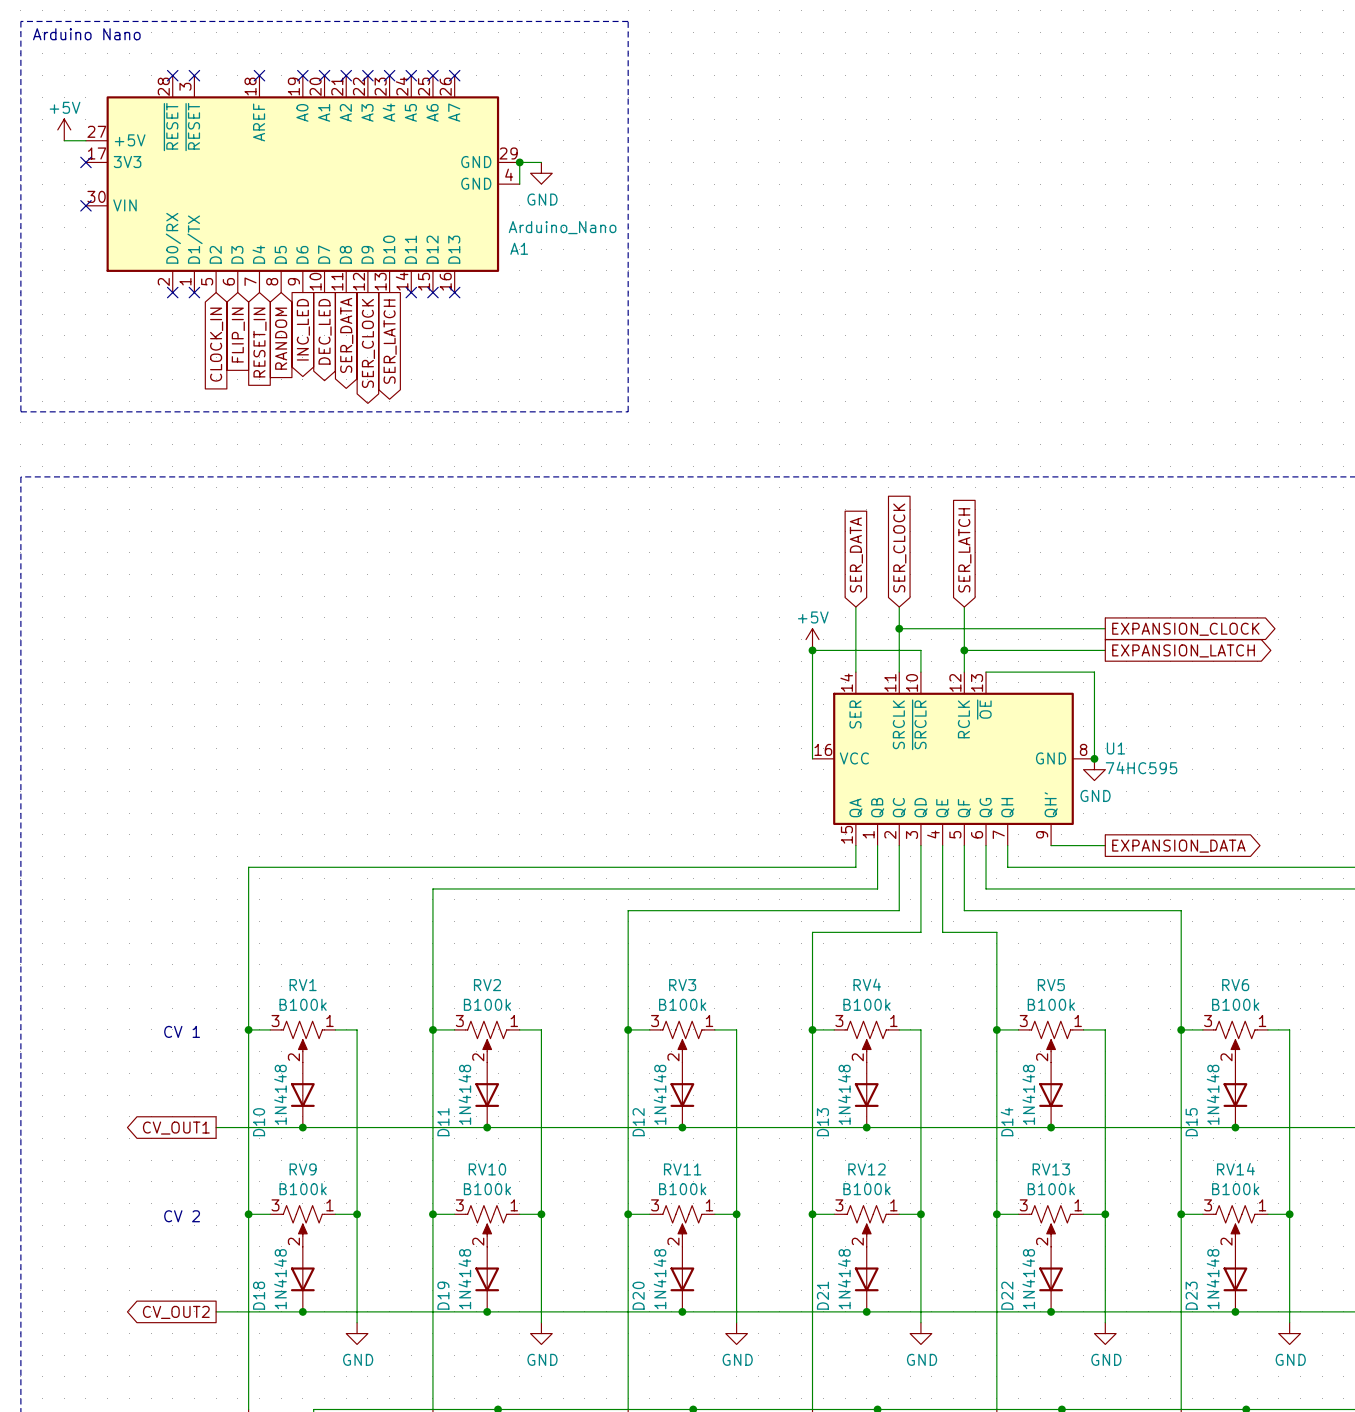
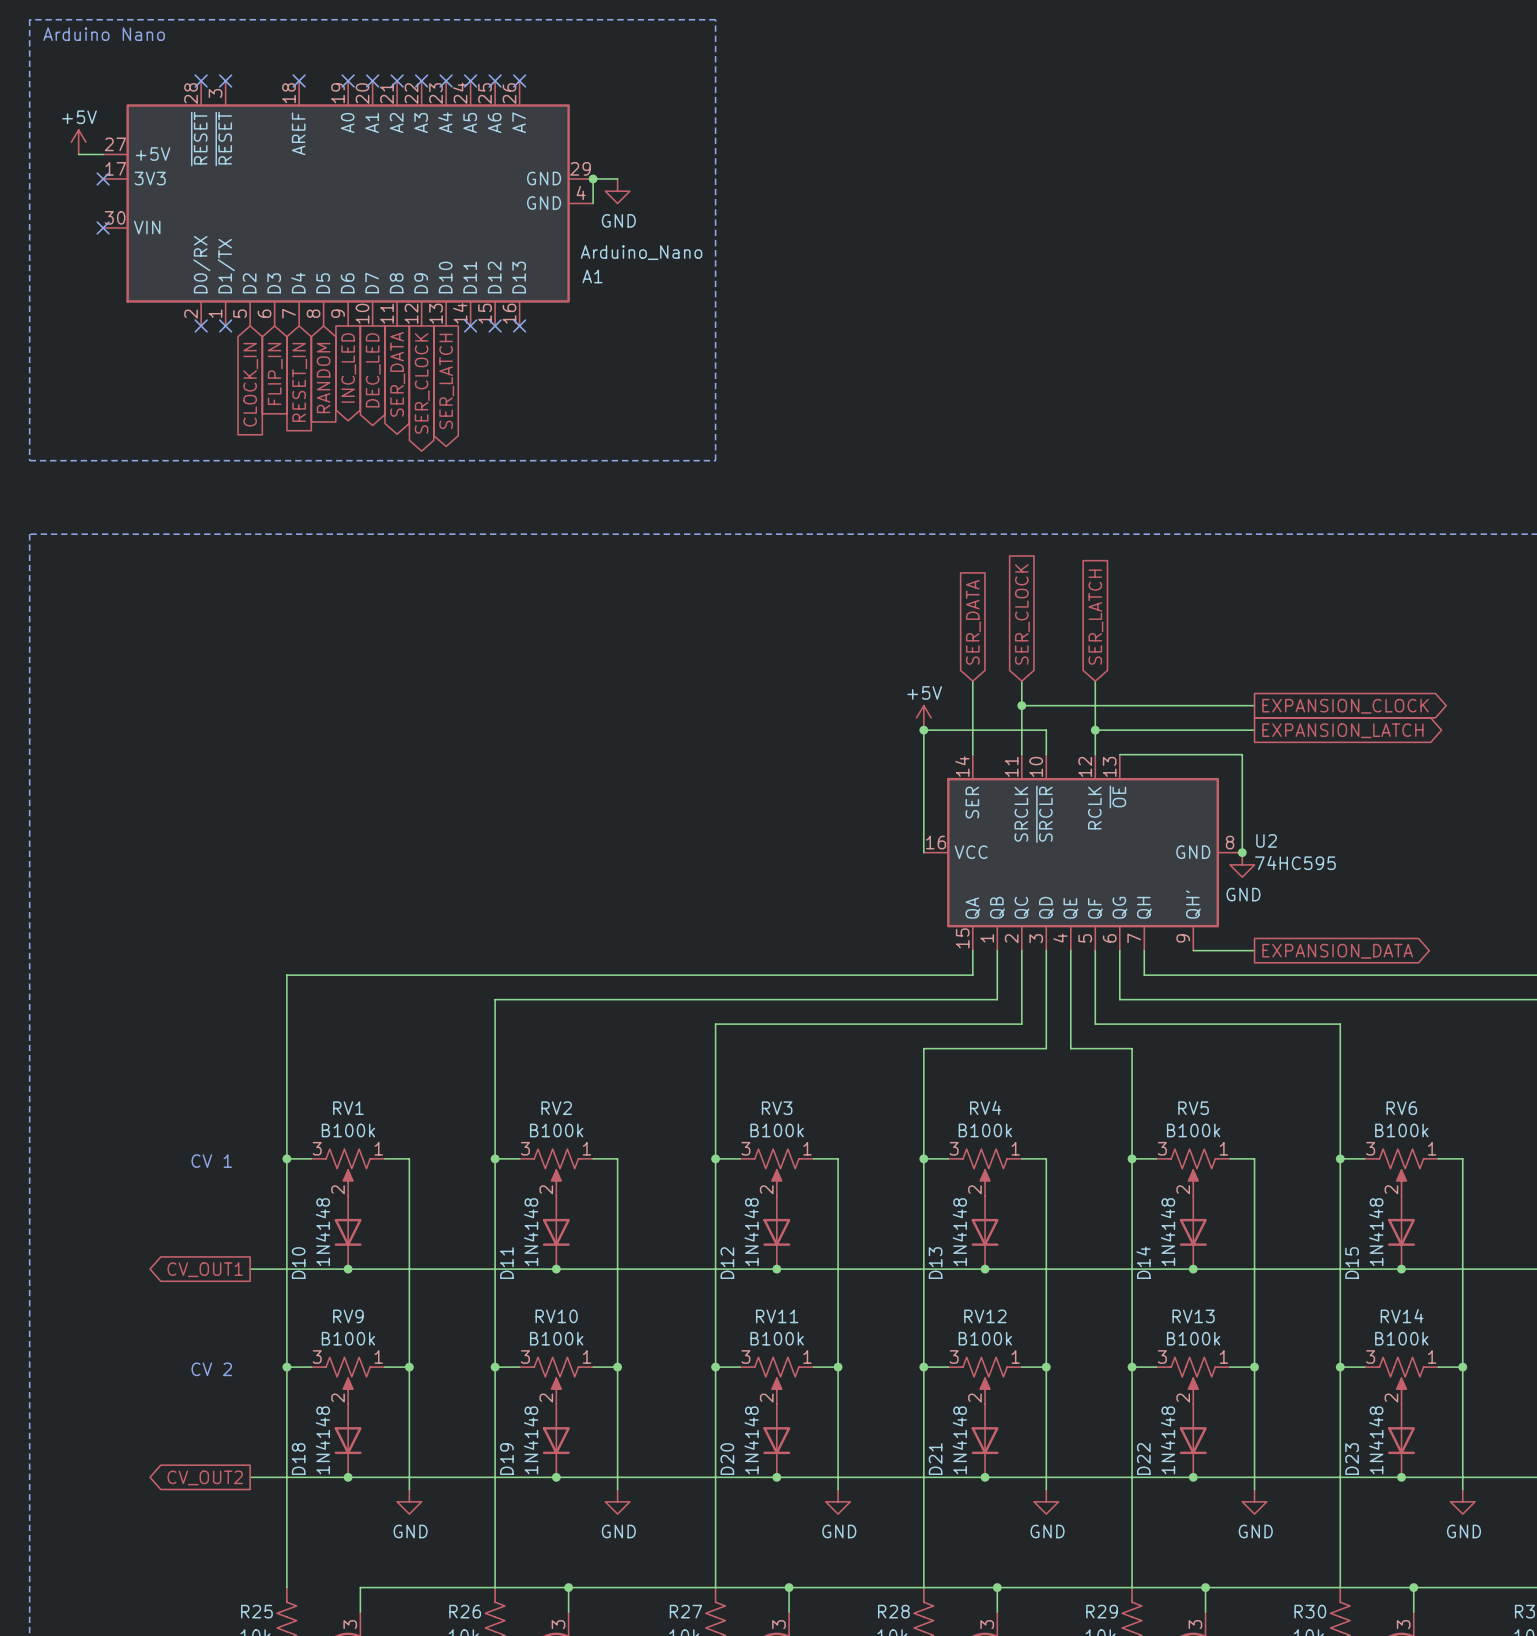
U1 name: U1 (1115, 748) -> U2 (1266, 840)

